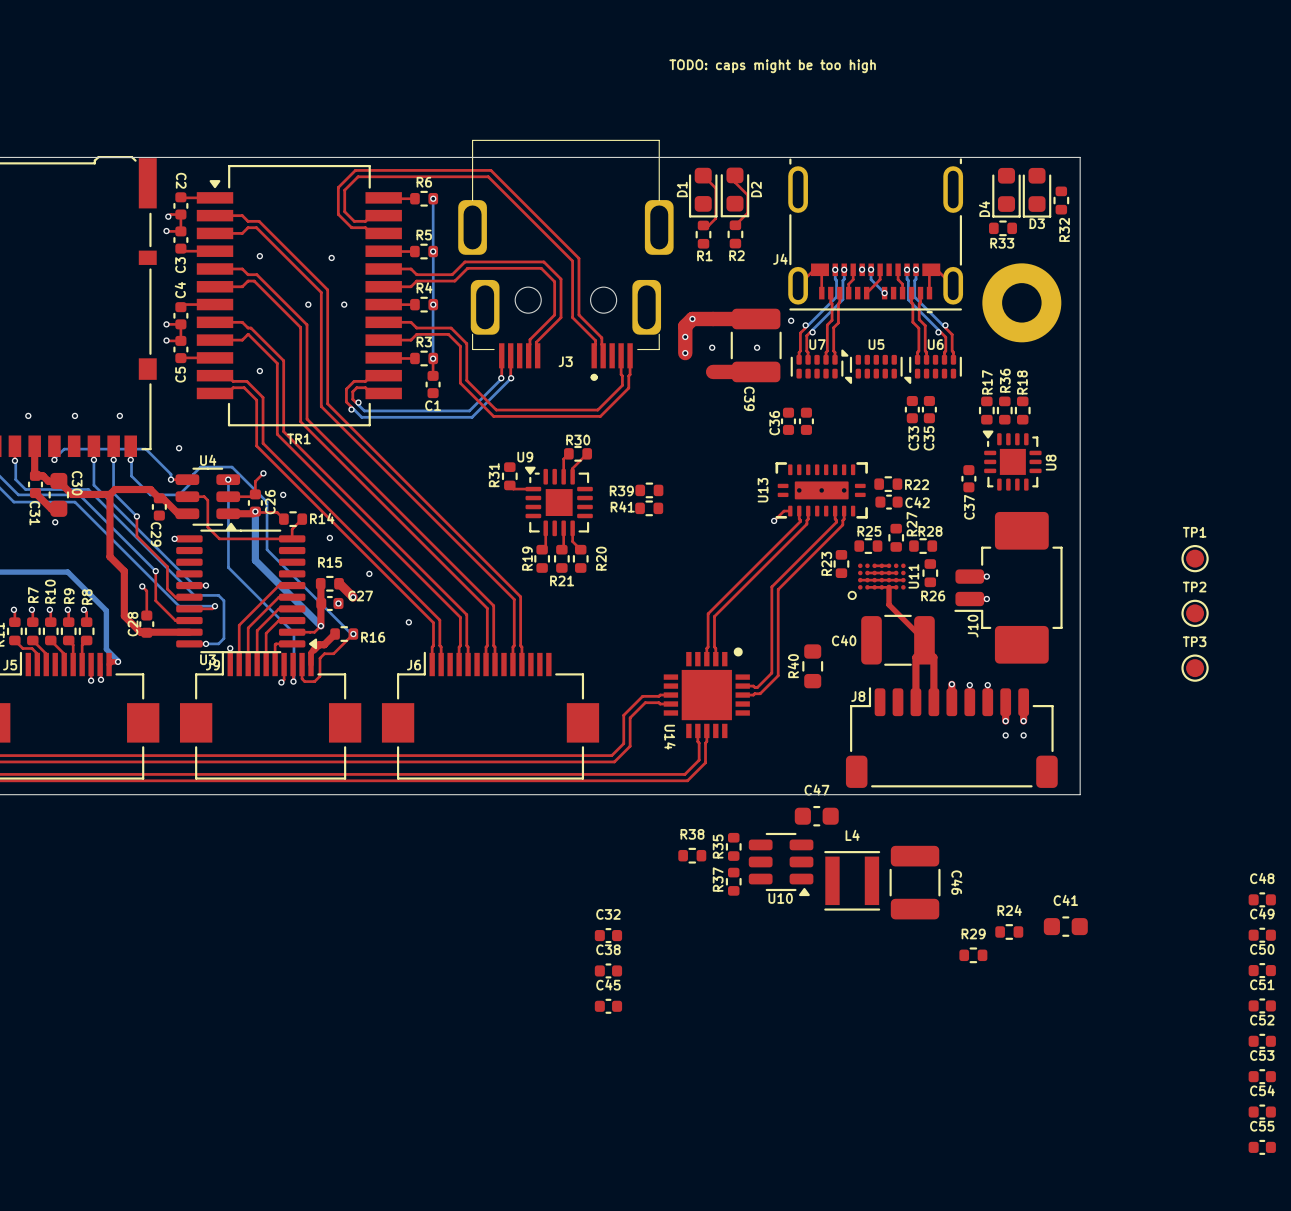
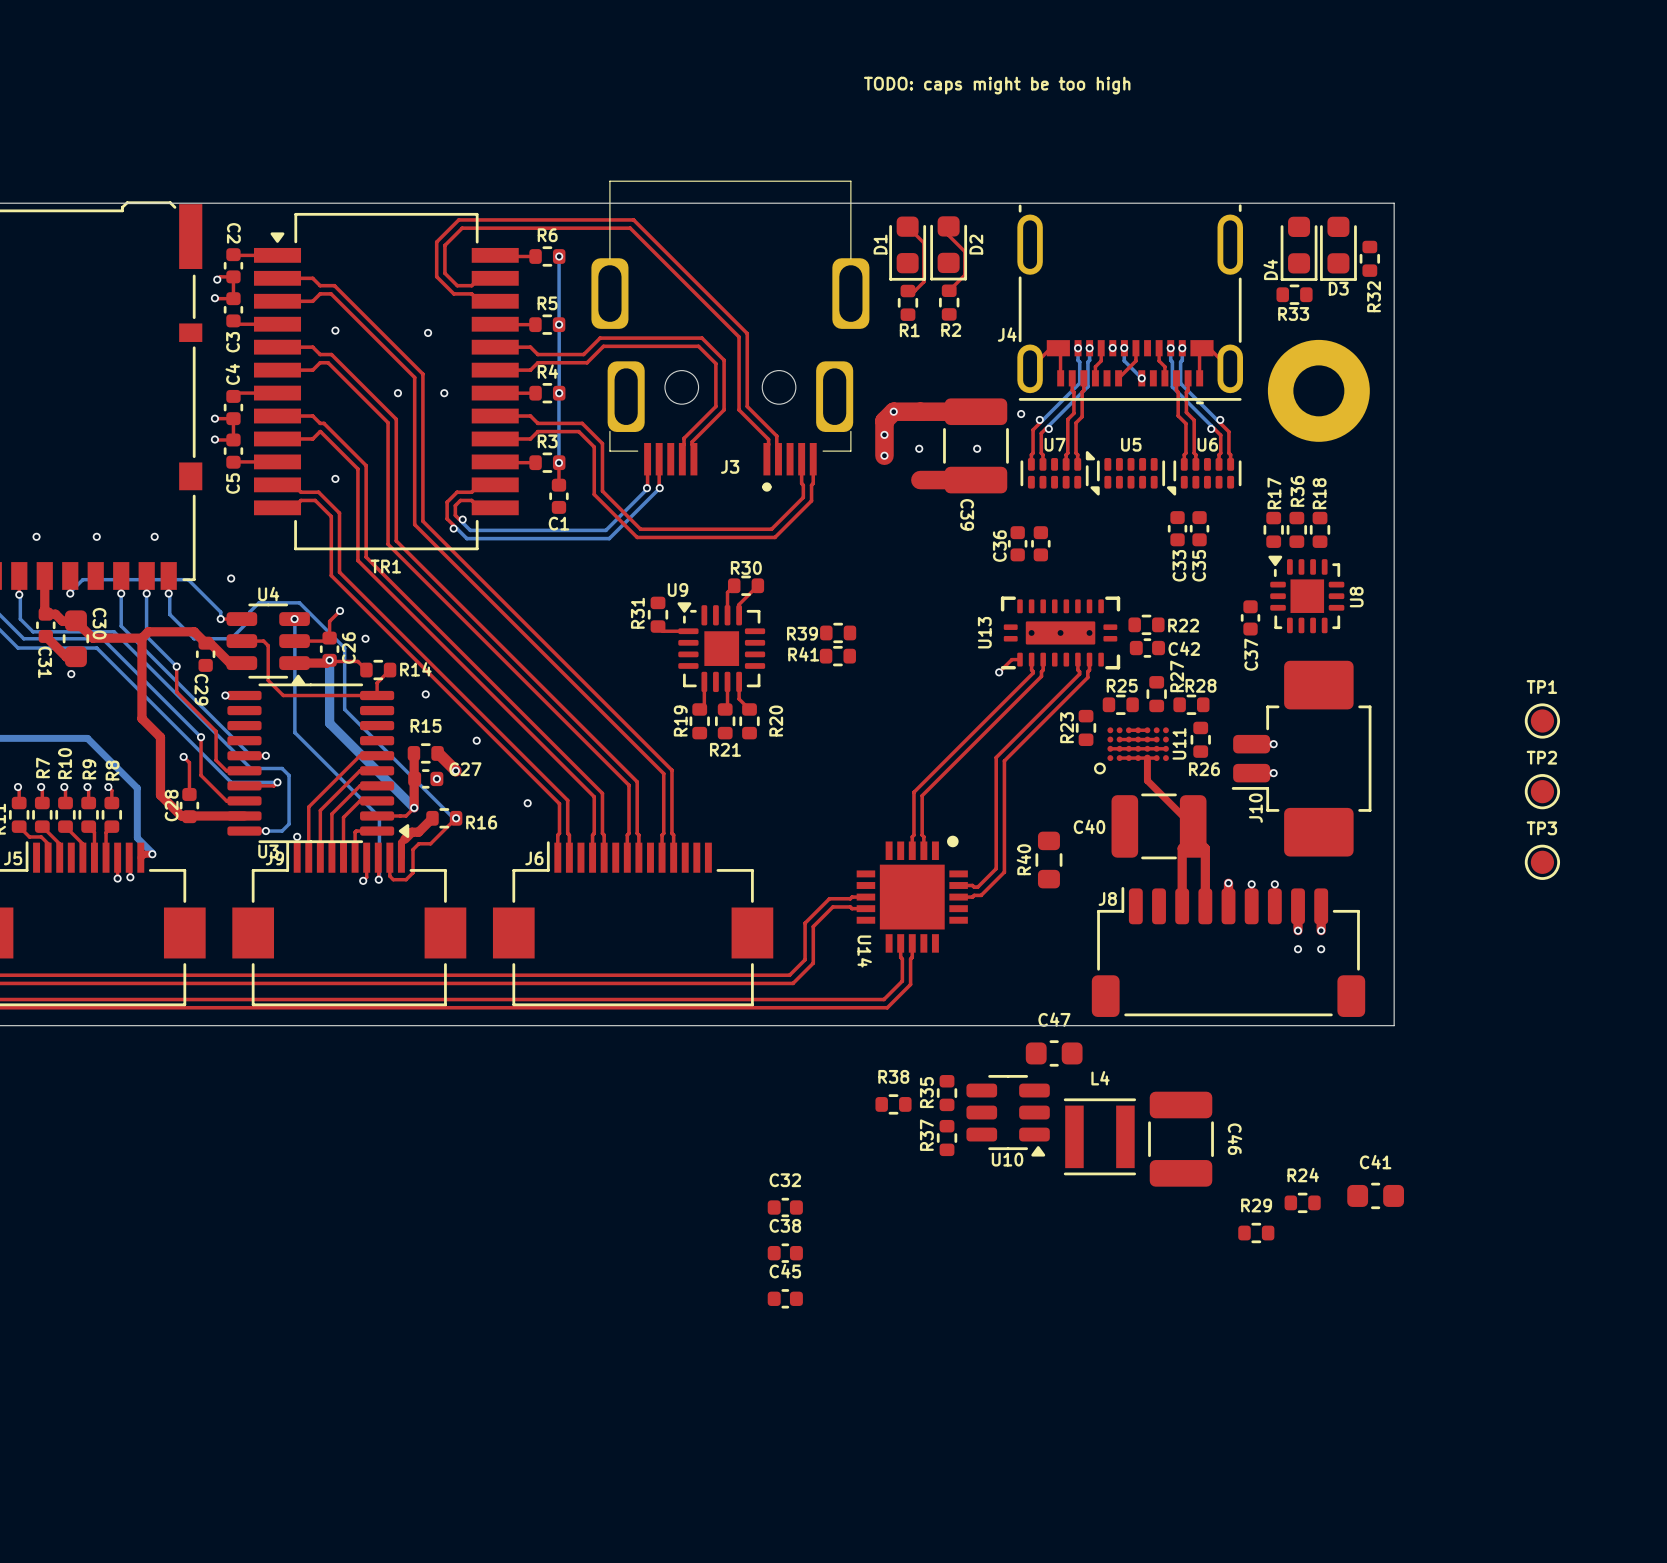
C48: (1262, 899) -> none
C49: (1262, 935) -> none
C50: (1262, 970) -> none
C51: (1262, 1005) -> none
C52: (1262, 1041) -> none
C53: (1262, 1076) -> none
C54: (1262, 1112) -> none
C55: (1262, 1147) -> none

